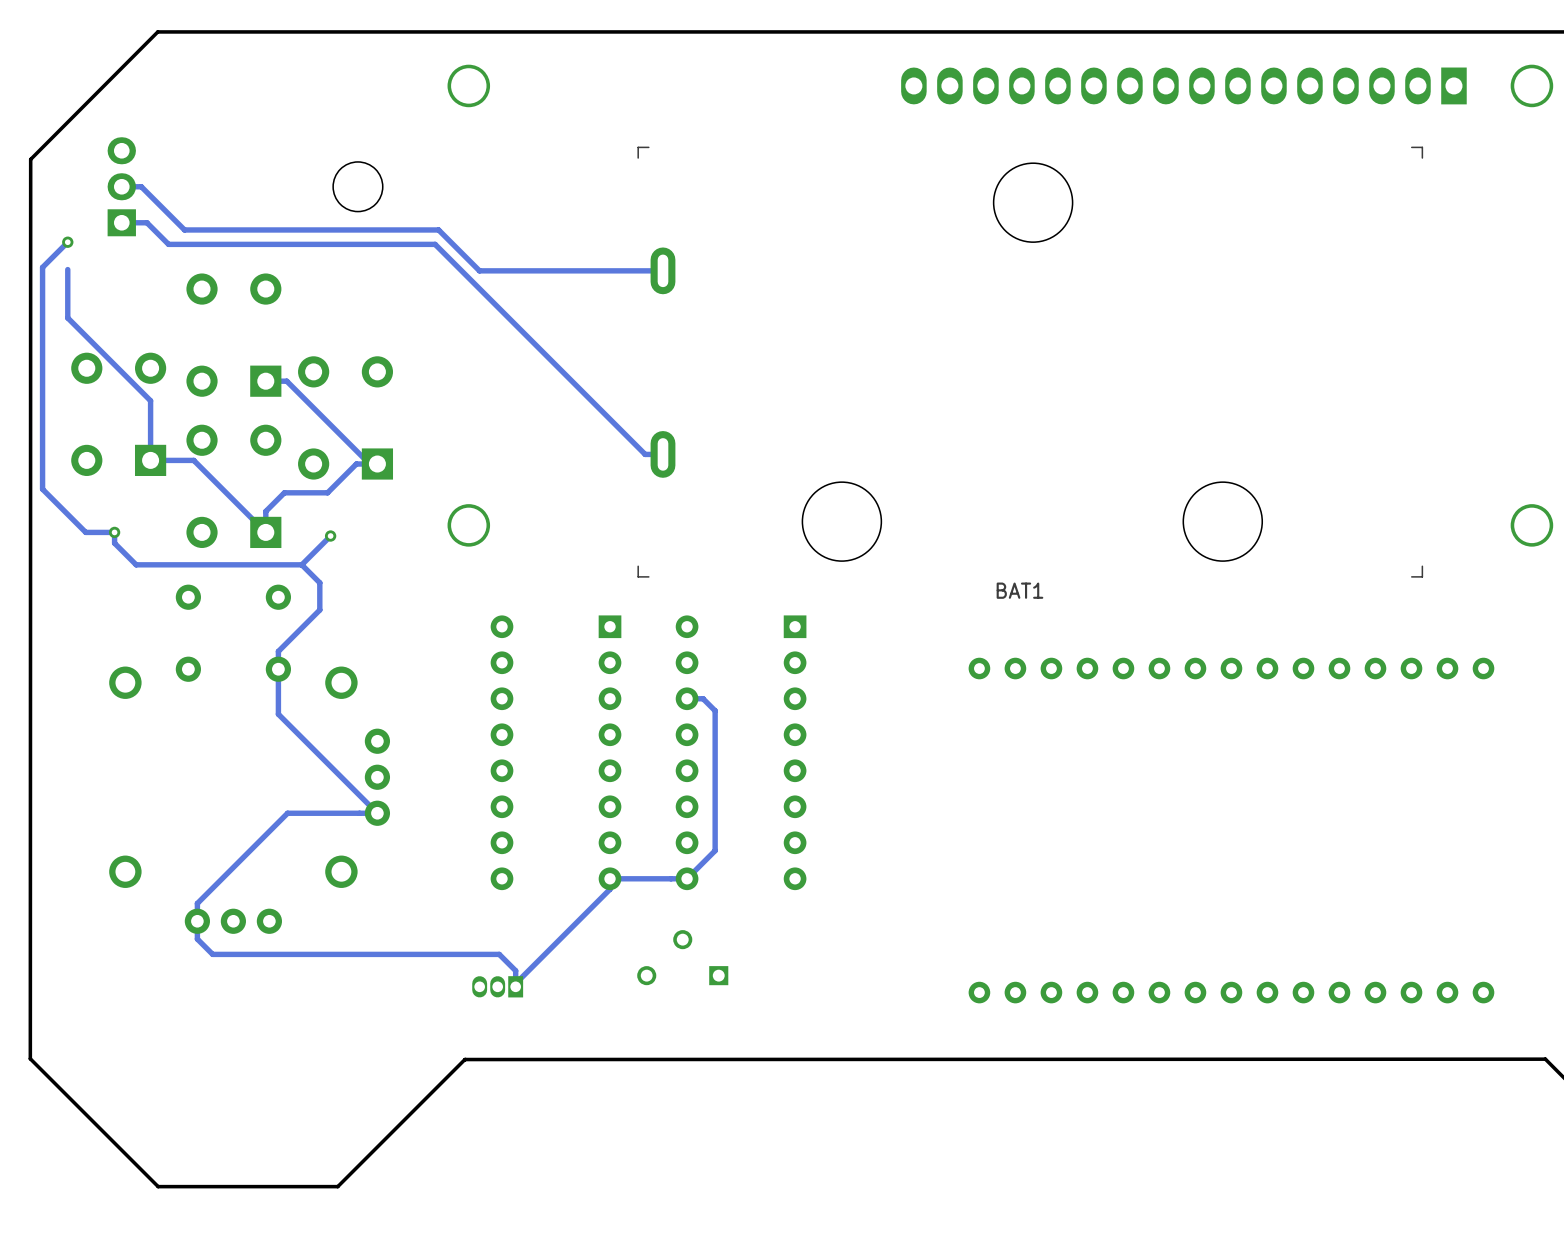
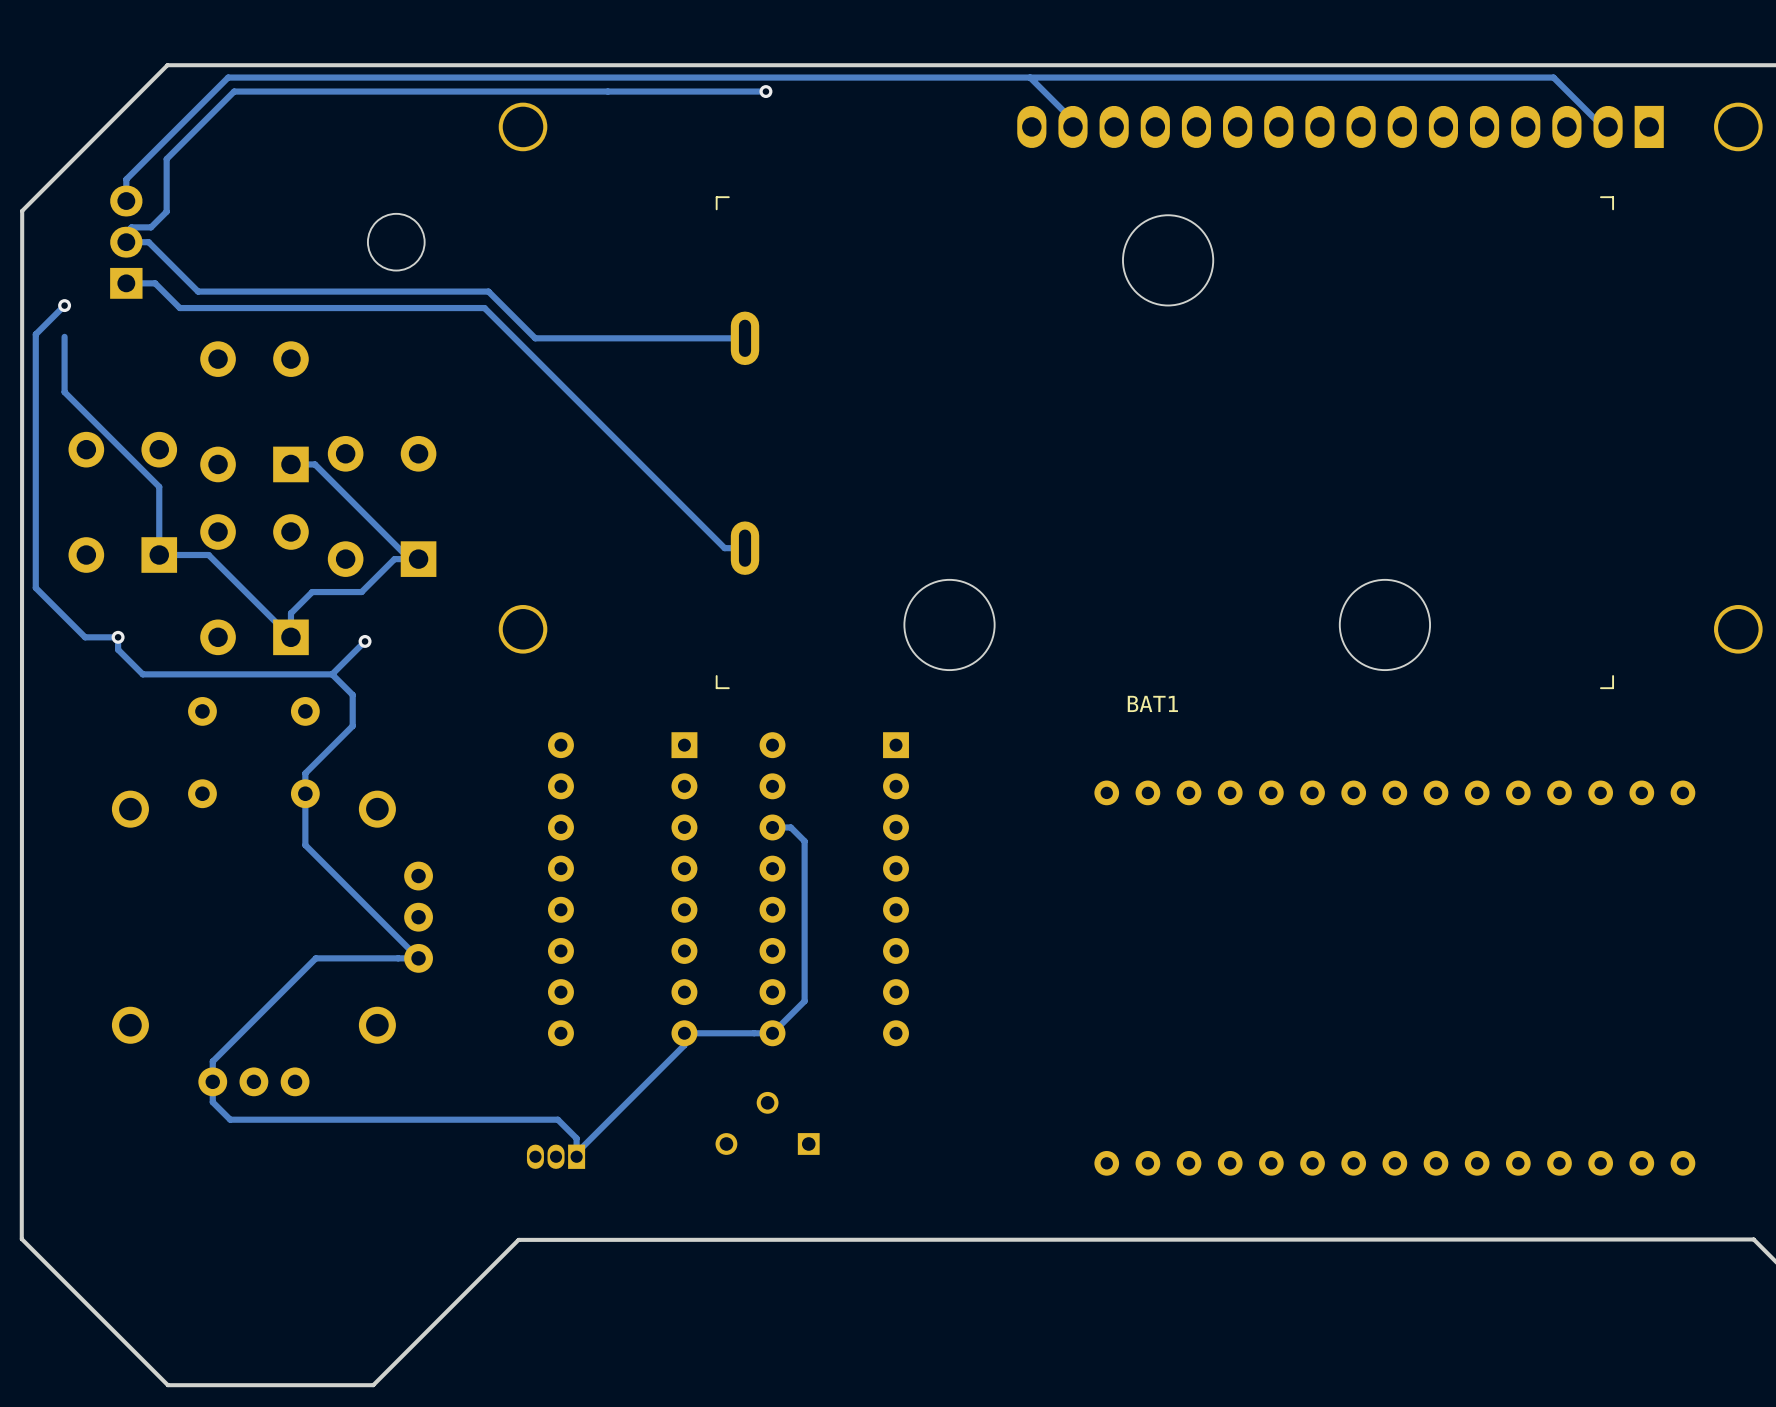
track: none -> (1030, 77) (1072, 120) (1072, 126)
track: none -> (765, 91) (234, 91) (166, 159) (166, 211) (151, 227) (131, 227) (126, 232) (126, 242)
via: none -> (765, 91)
track: none -> (1608, 126) (1602, 126) (1553, 77) (228, 77) (126, 179) (126, 201)

